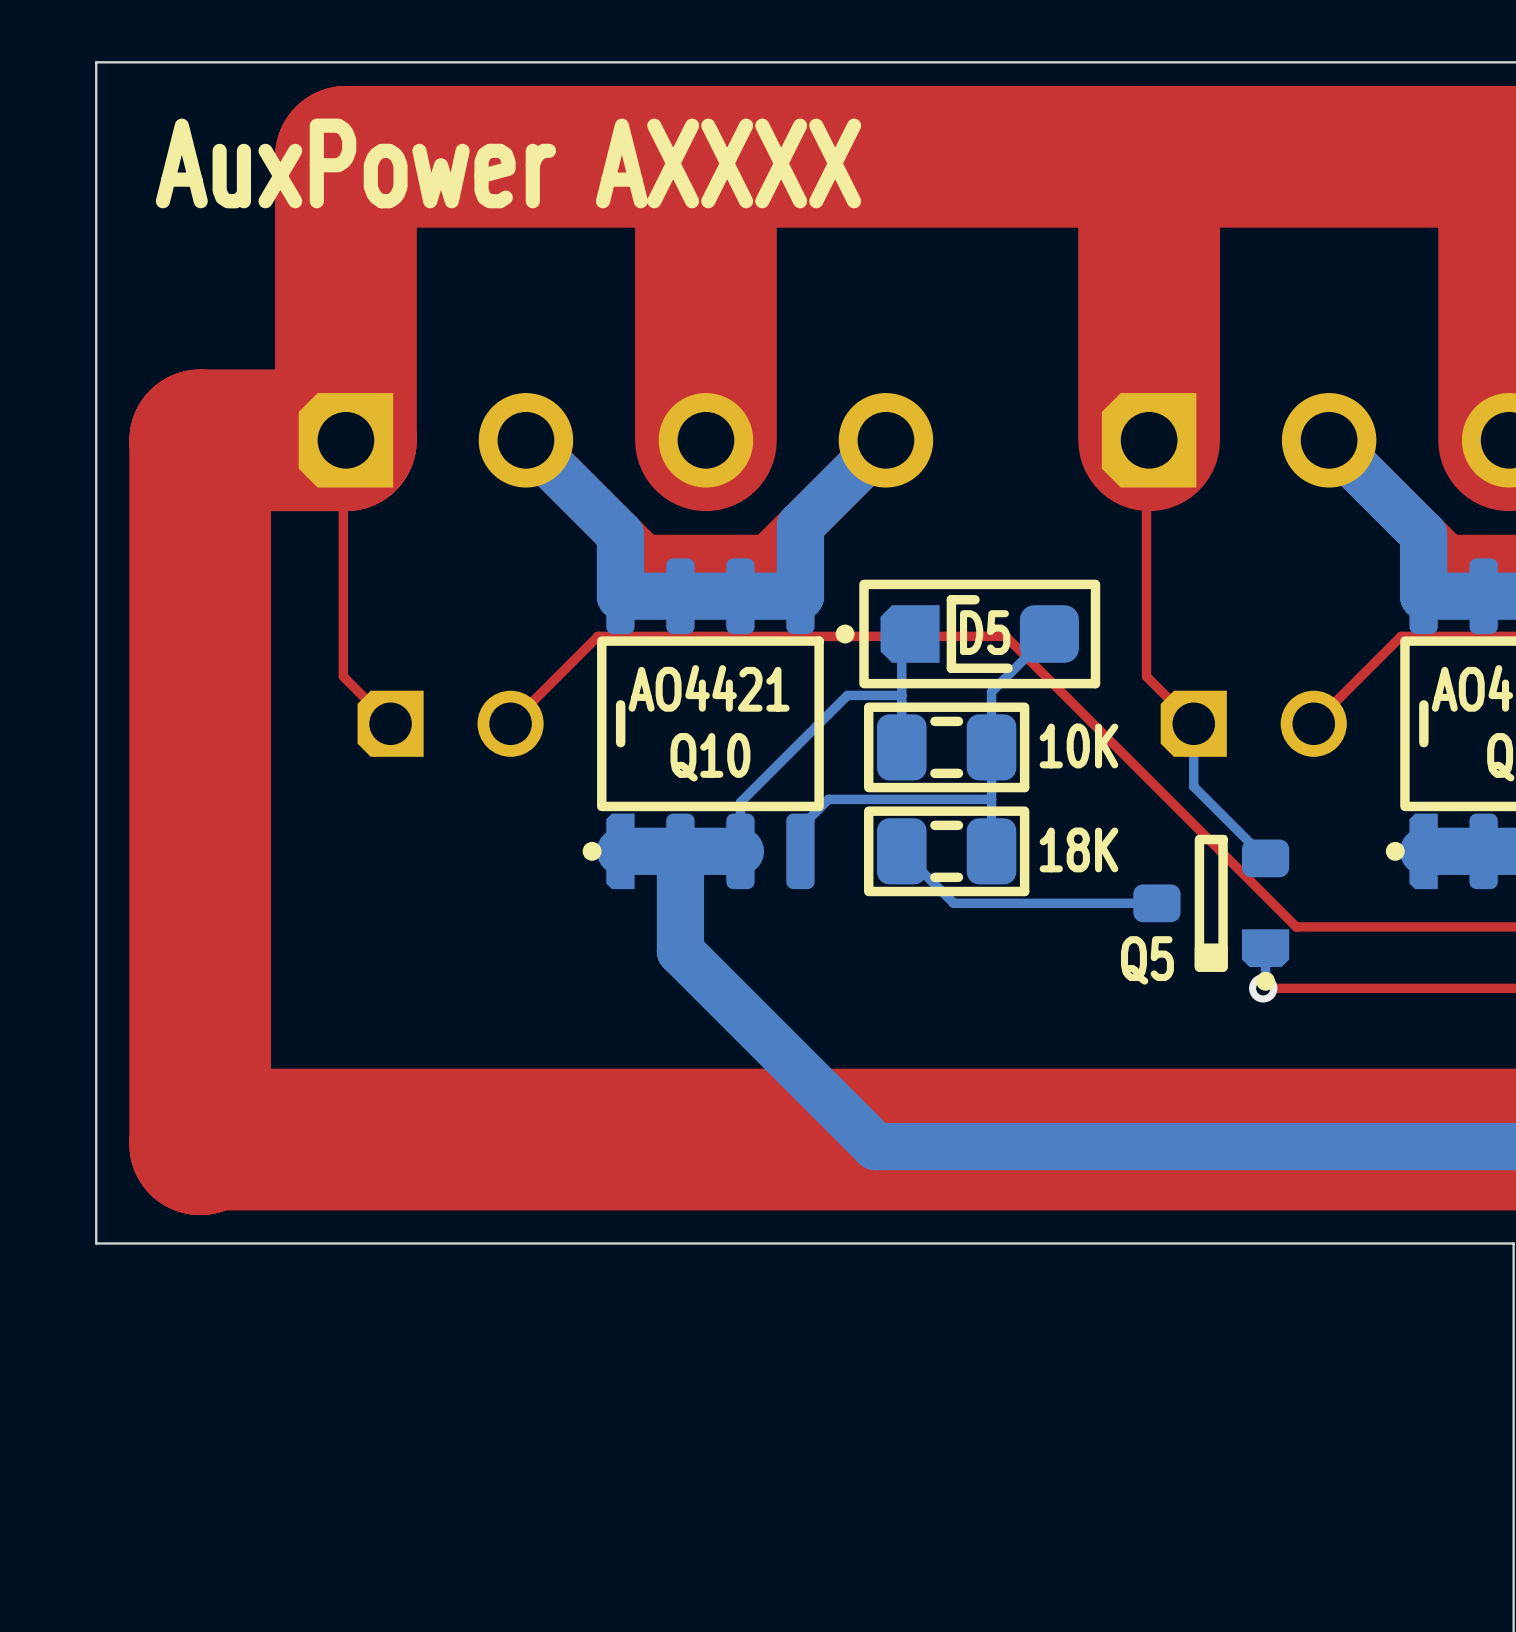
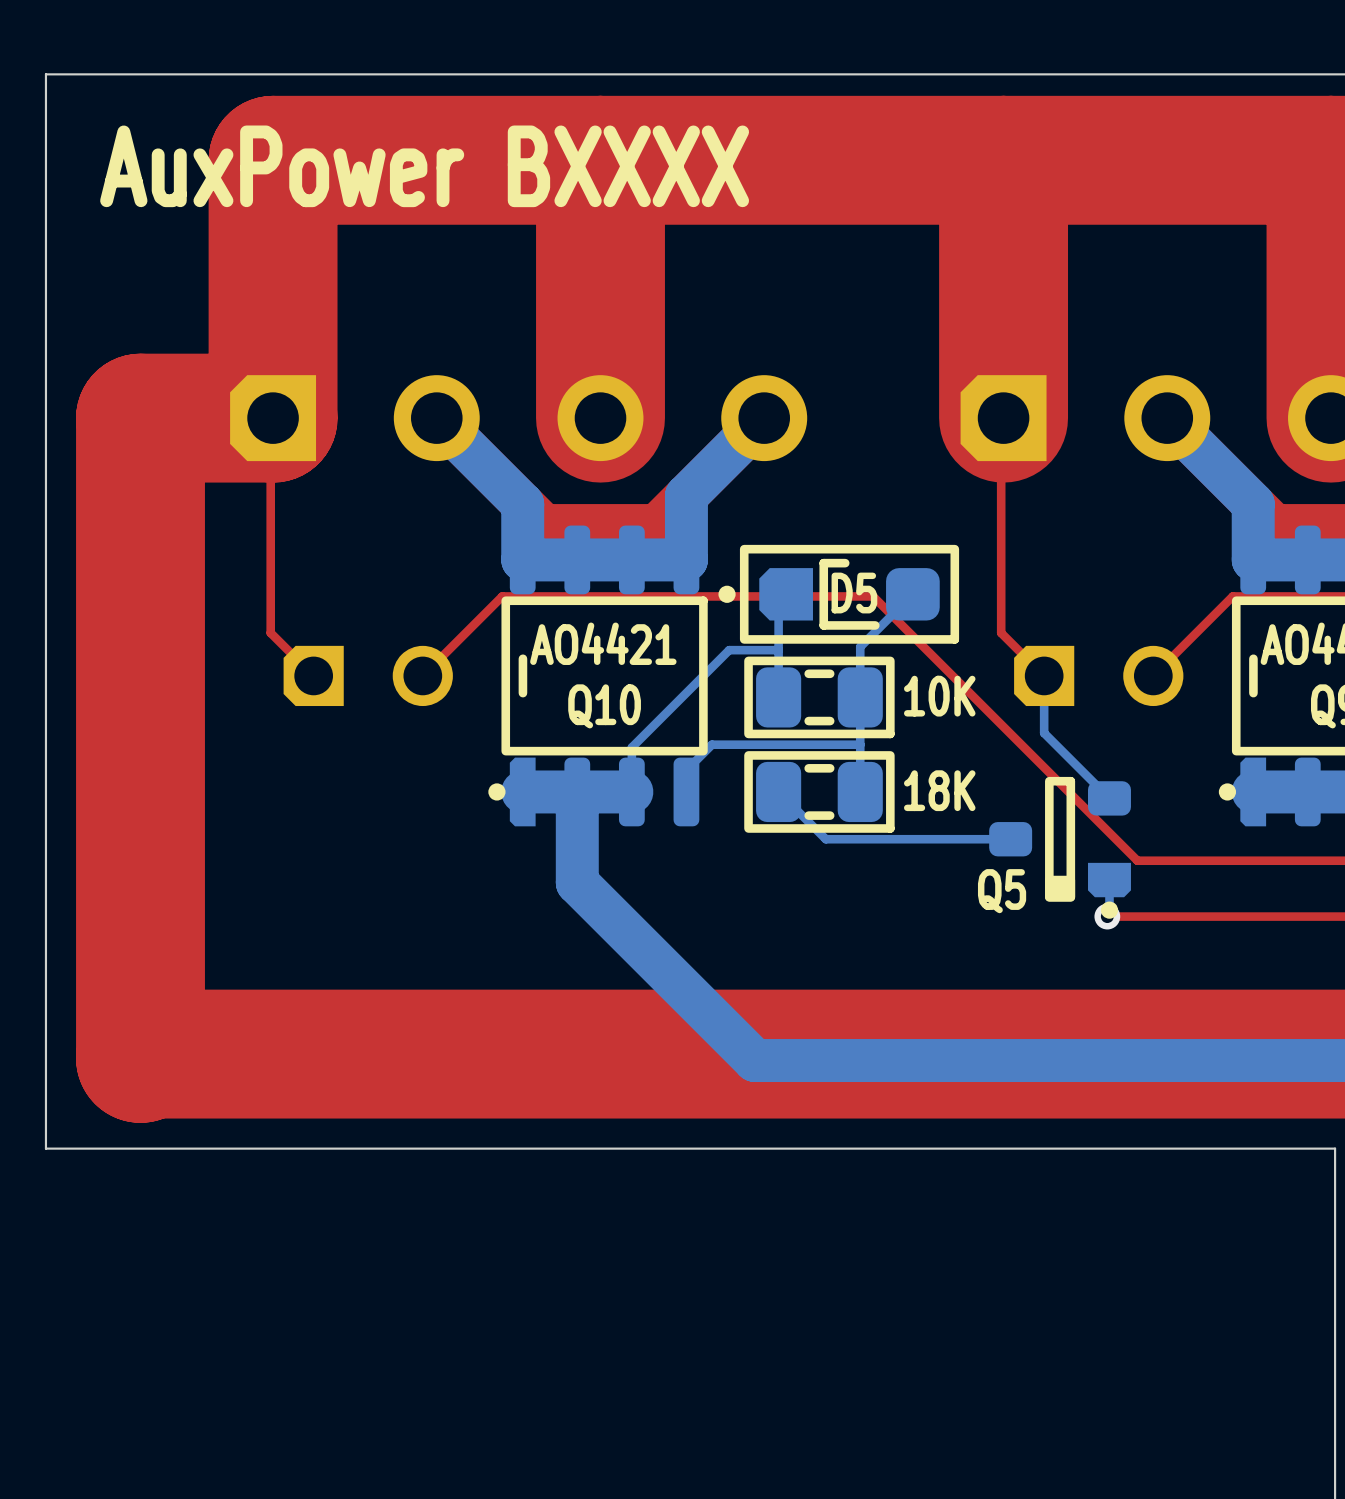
text: AuxPower AXXXX (508, 163) -> AuxPower BXXXX (424, 166)

